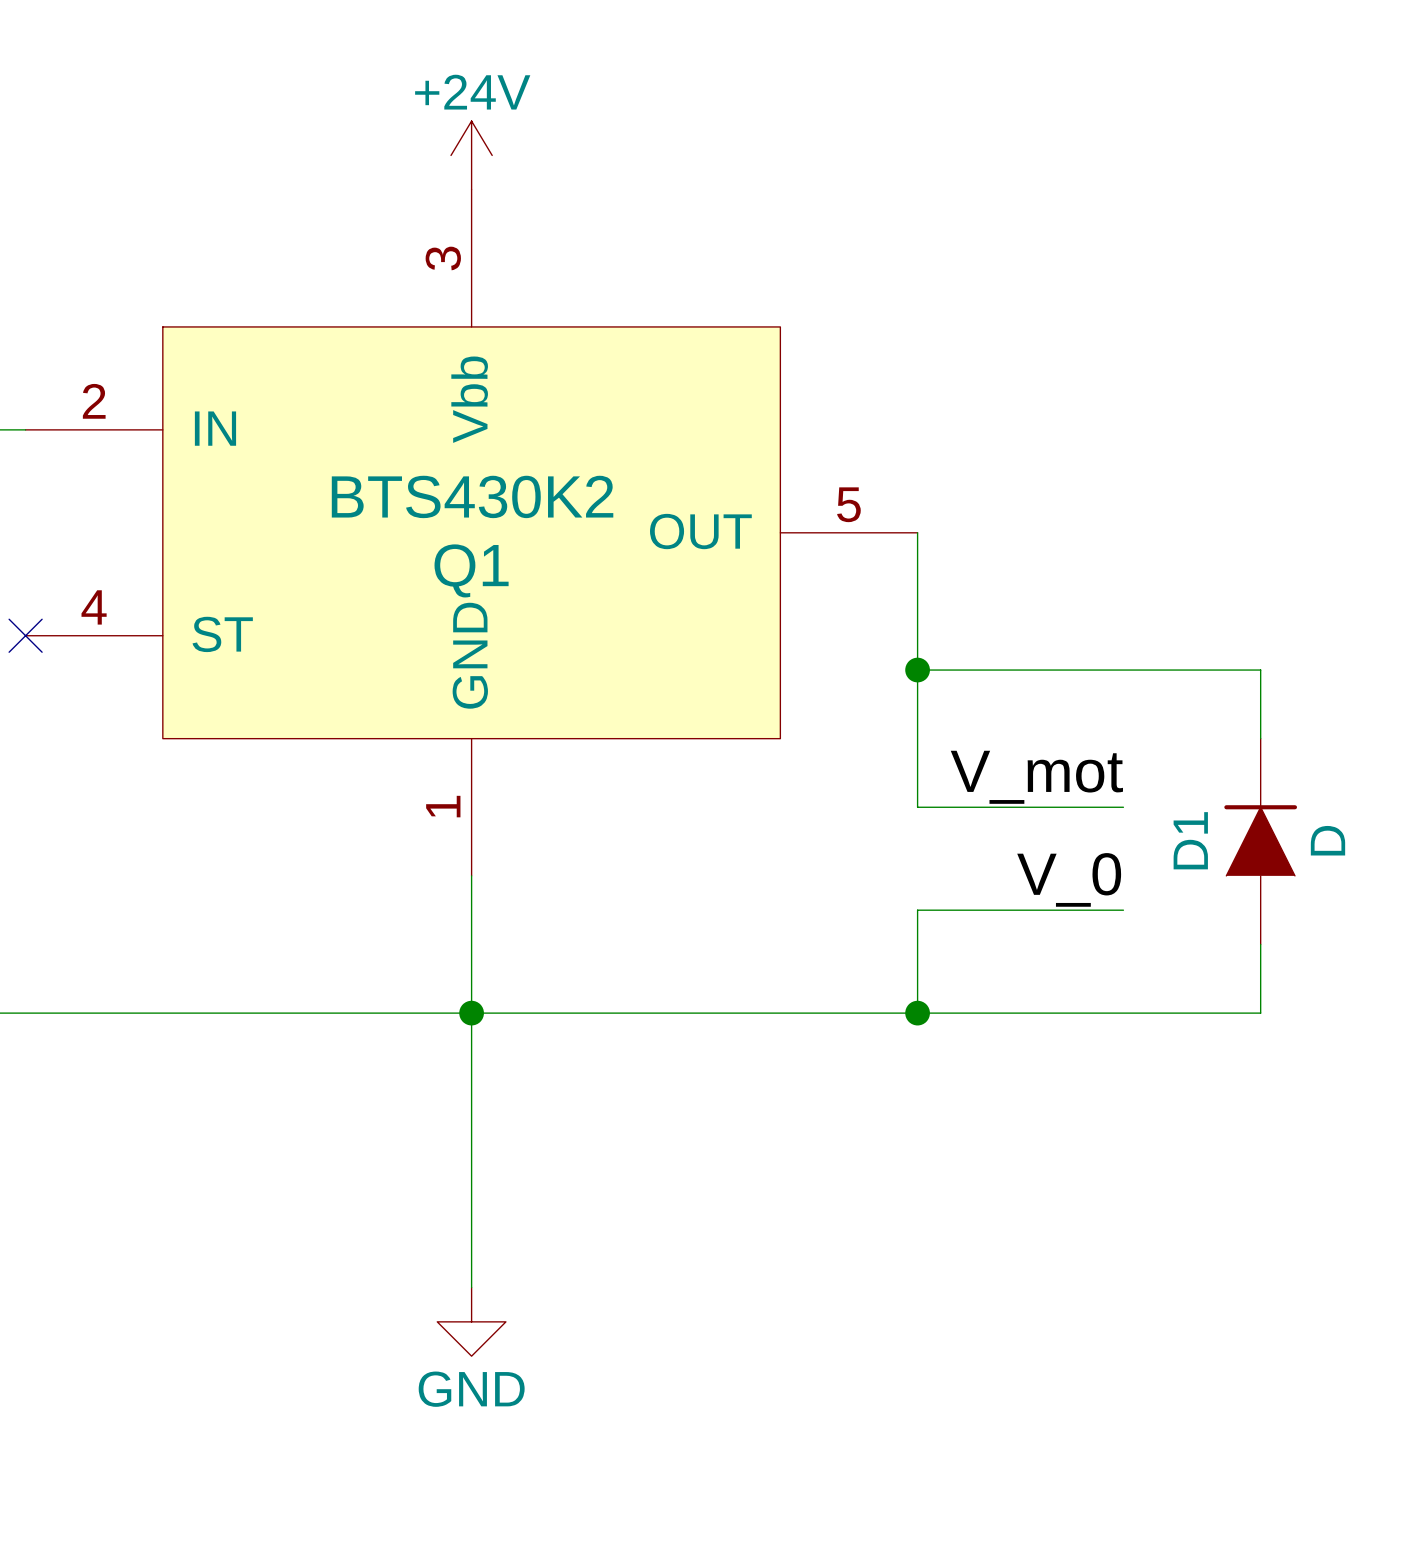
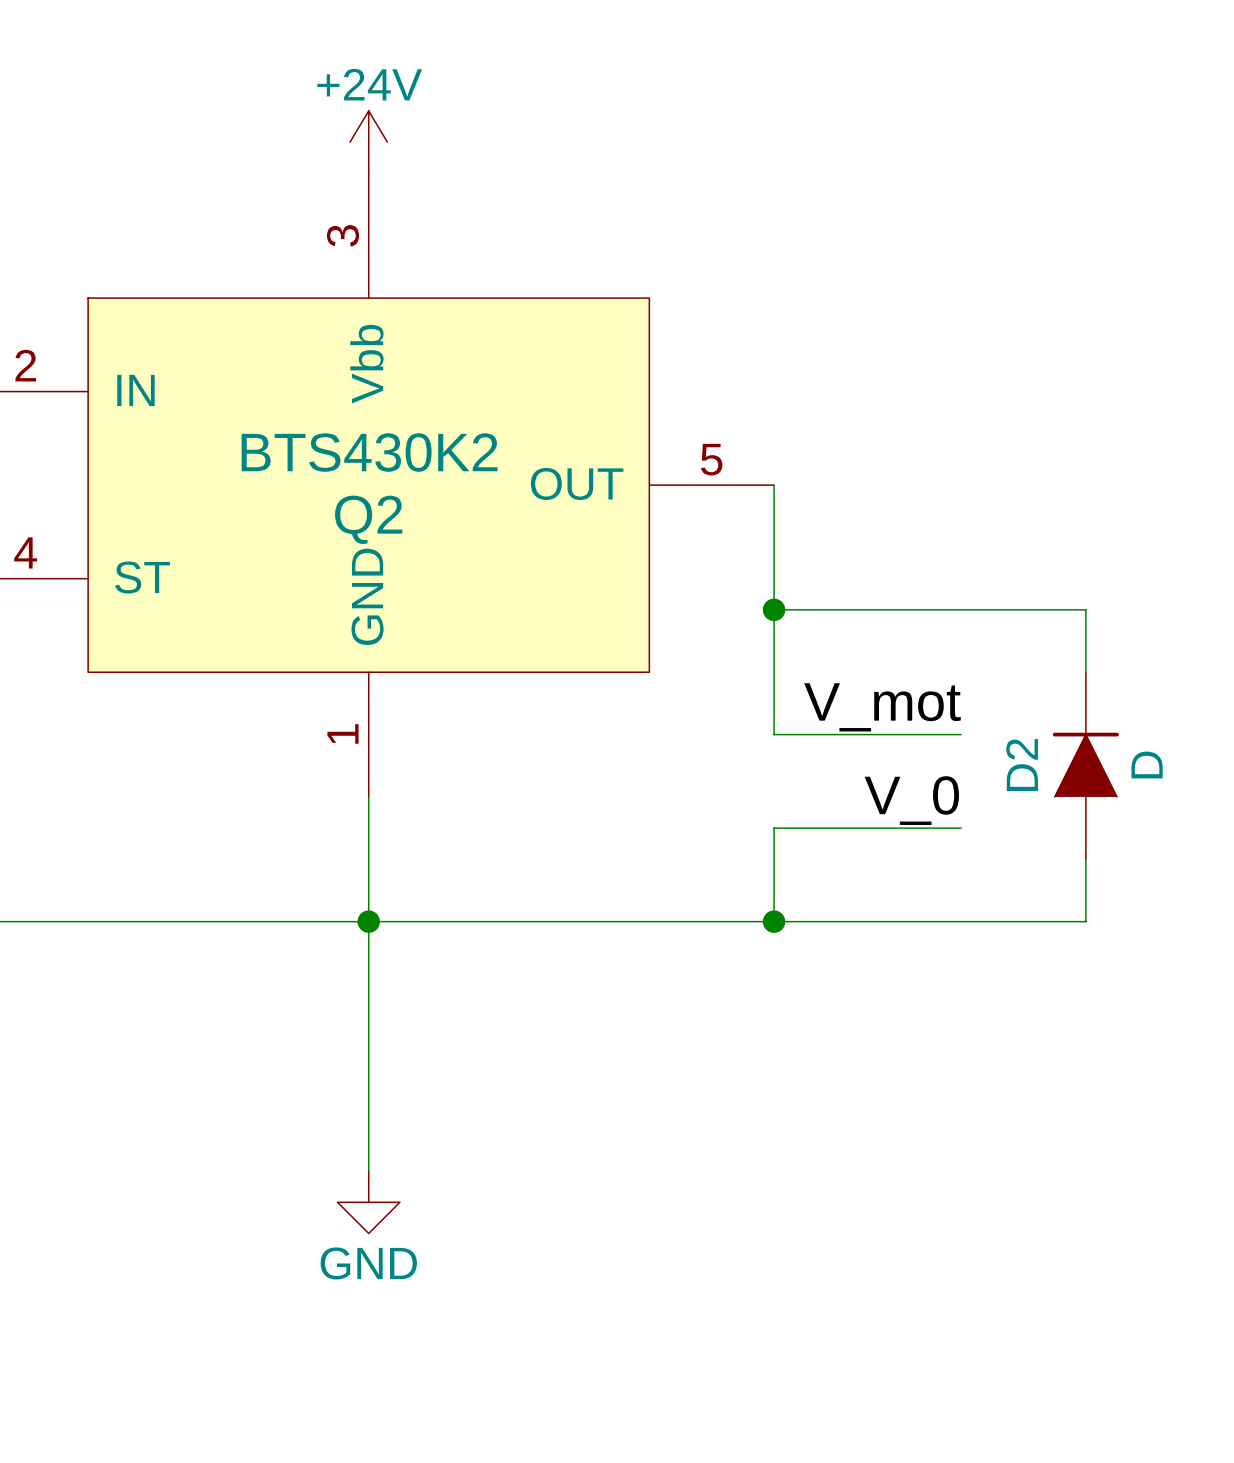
Q1 name: Q1 (471, 570) -> Q2 (368, 519)
D1 name: D1 (1190, 840) -> D2 (1022, 765)

